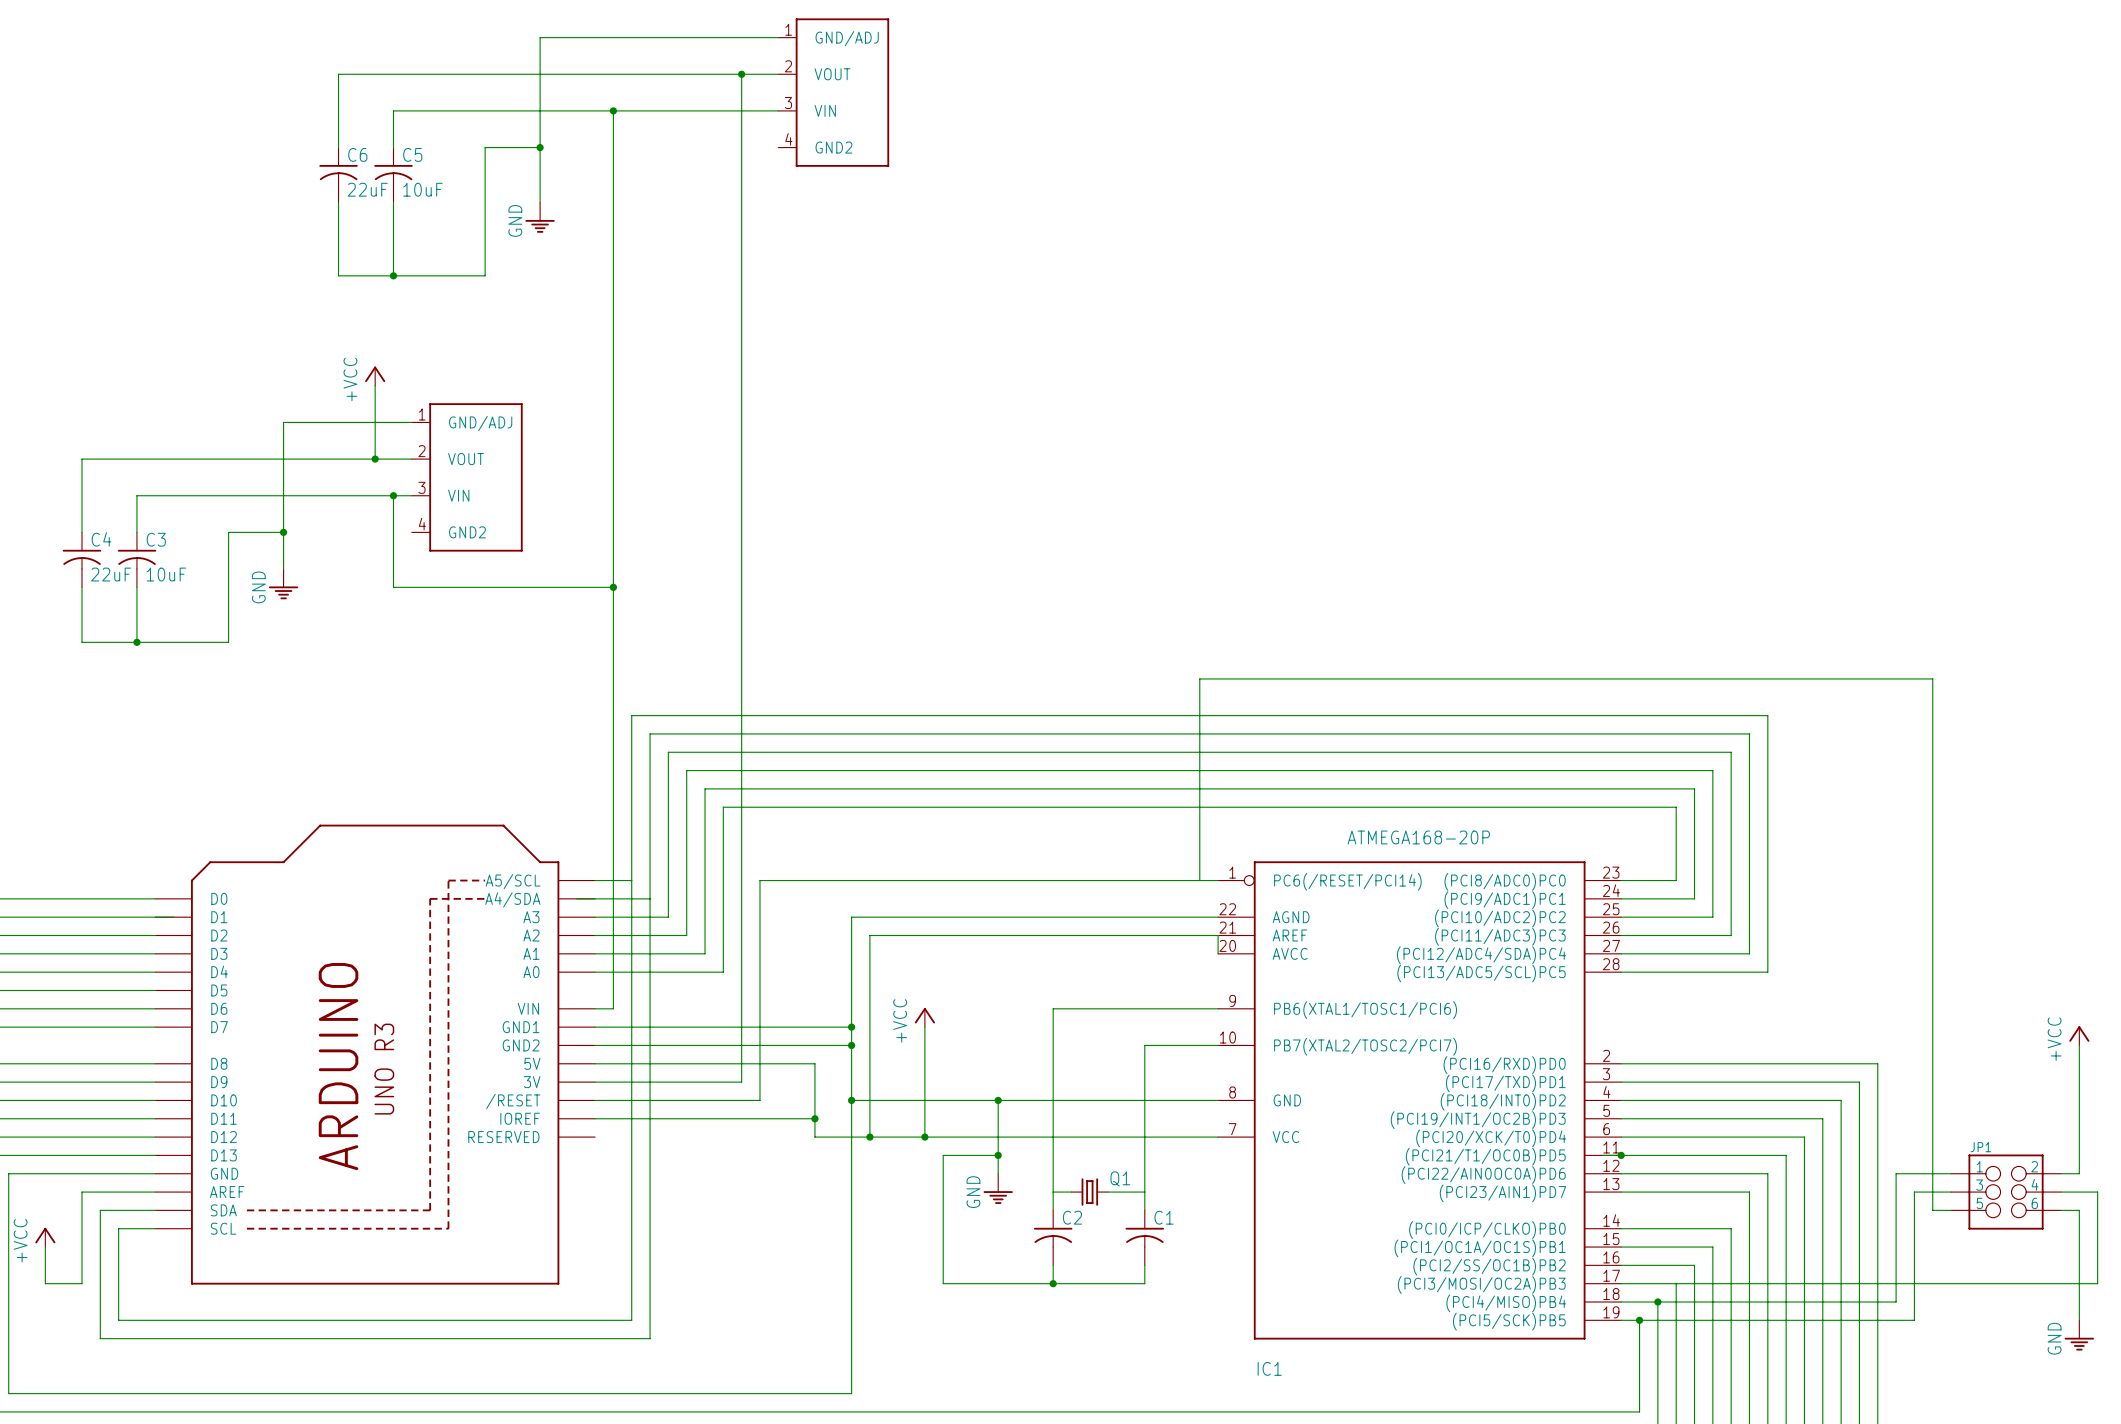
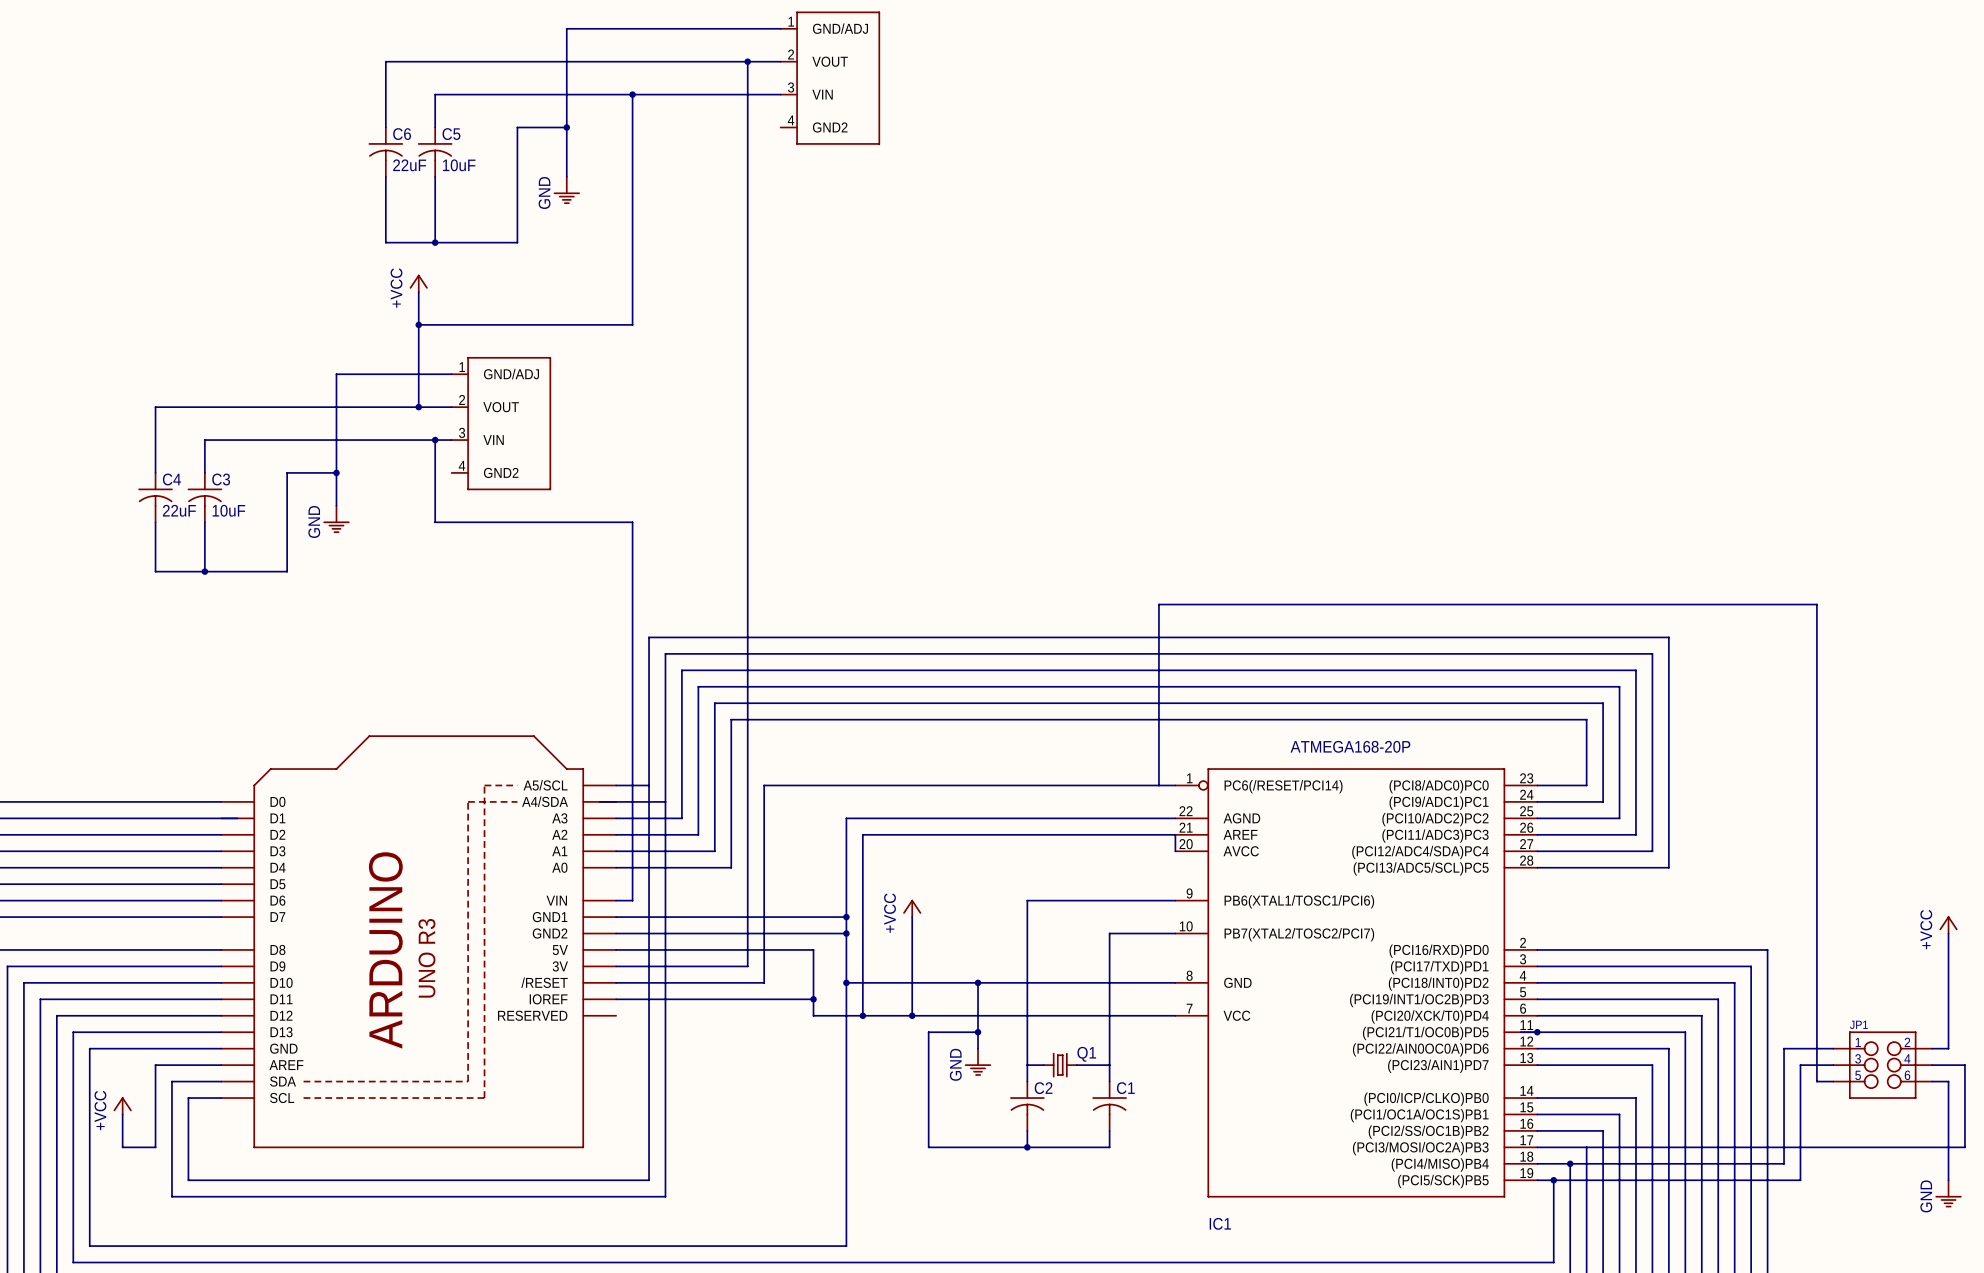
wire: none -> (418, 291) (418, 341)
junction: none -> (418, 324)
wire: (613, 367) (613, 587) -> (632, 324) (418, 324)
power symbol position: +VCC (375, 376) -> +VCC (418, 283)
junction: (613, 587) -> none

